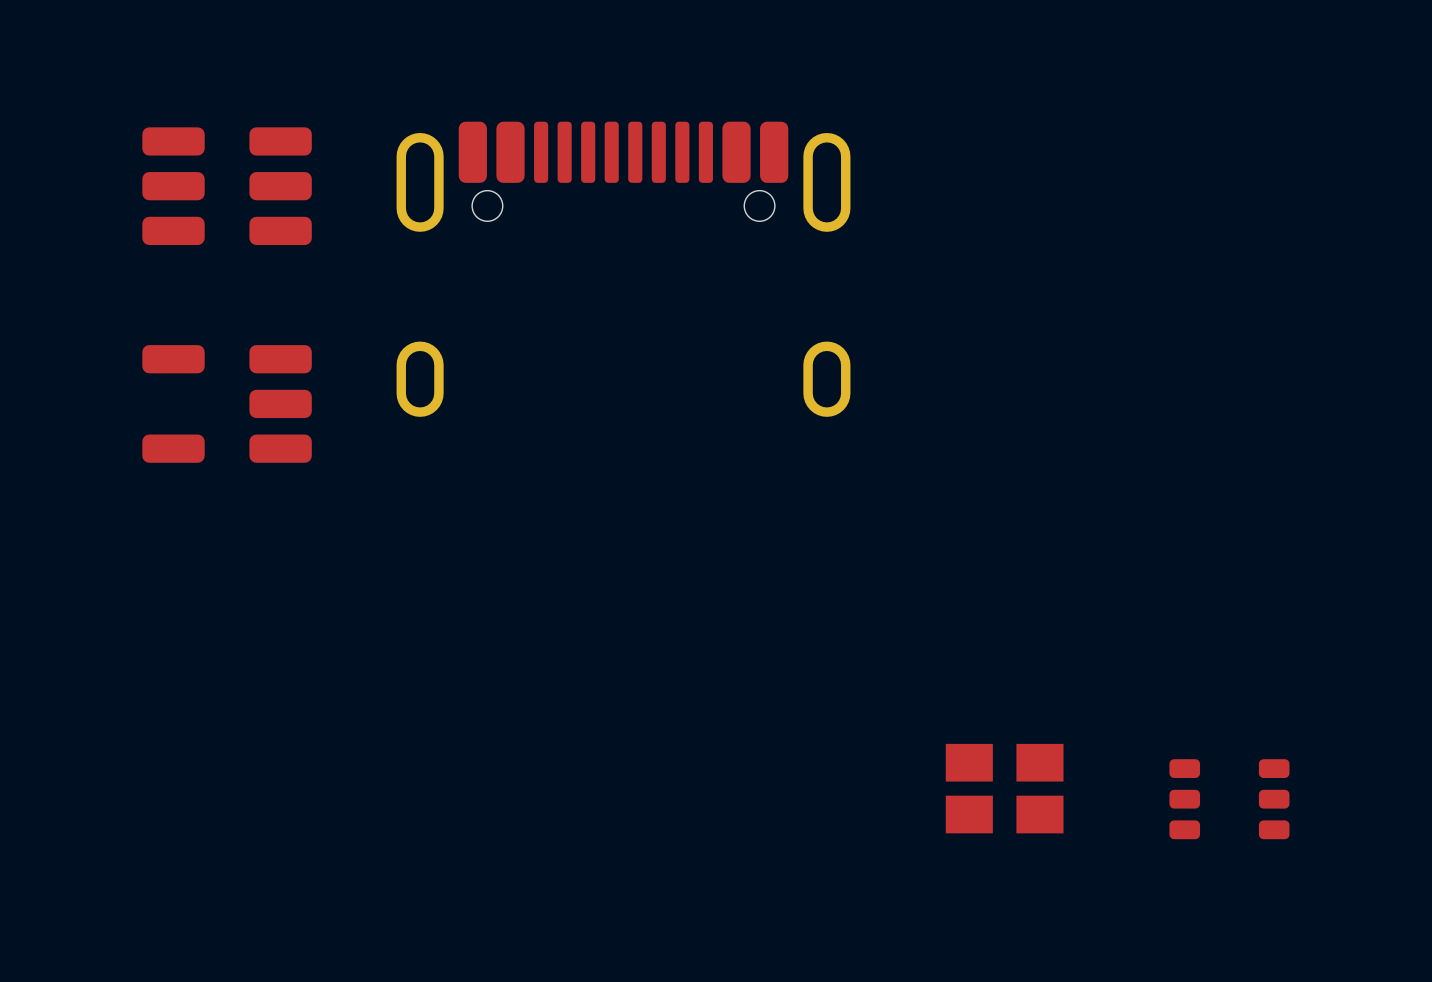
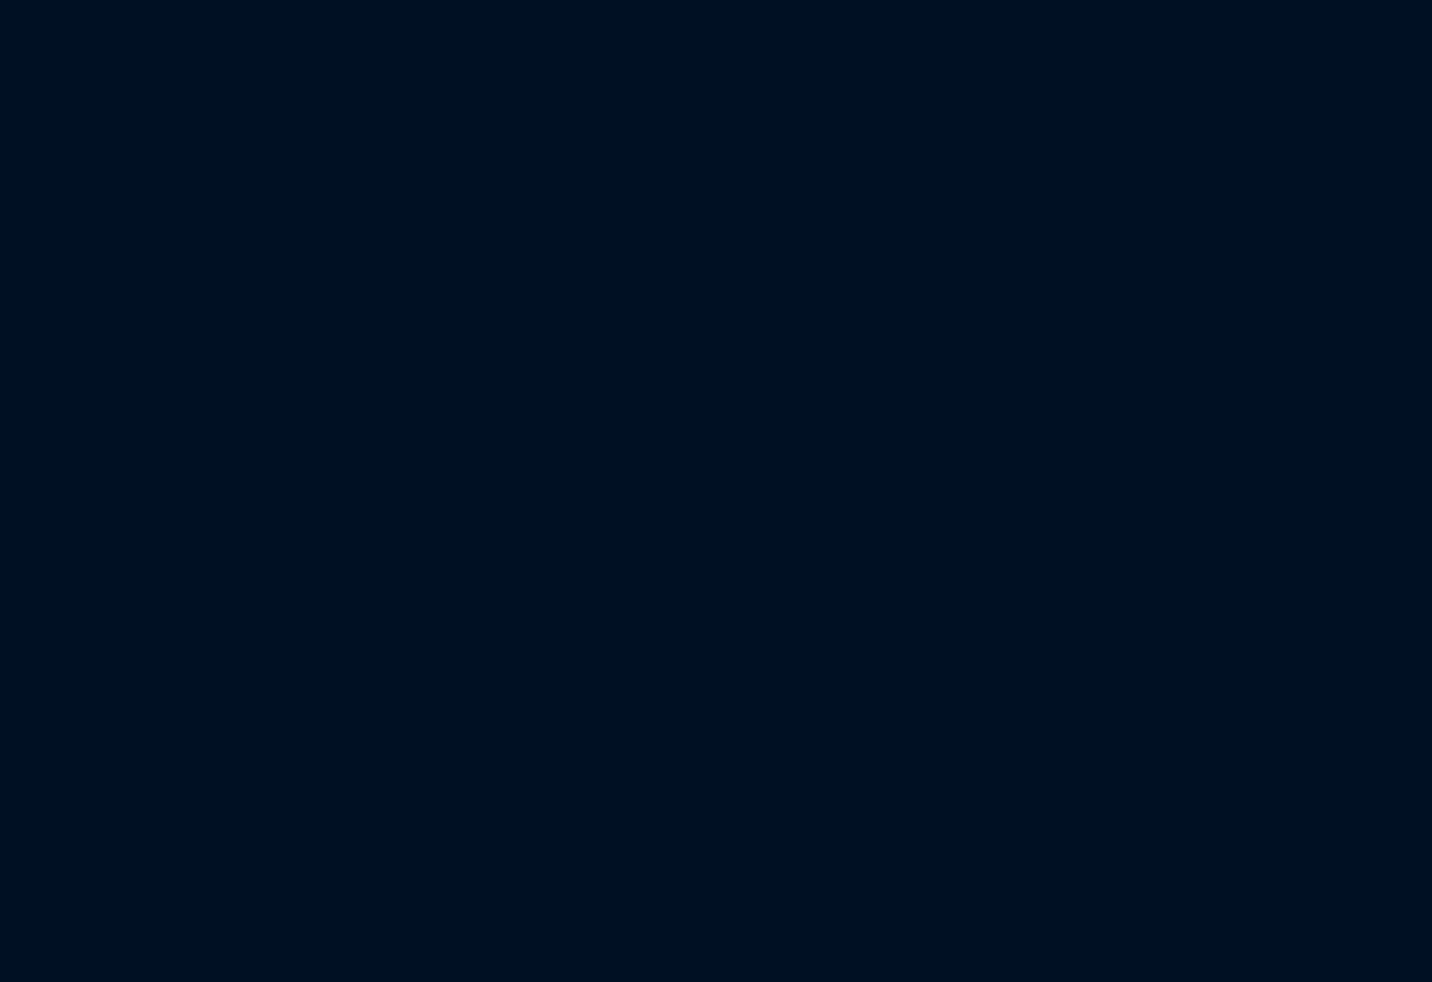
part: (227, 186) -> none
part: (623, 269) -> none
part: (227, 403) -> none
part: (1004, 788) -> none
part: (1229, 799) -> none

